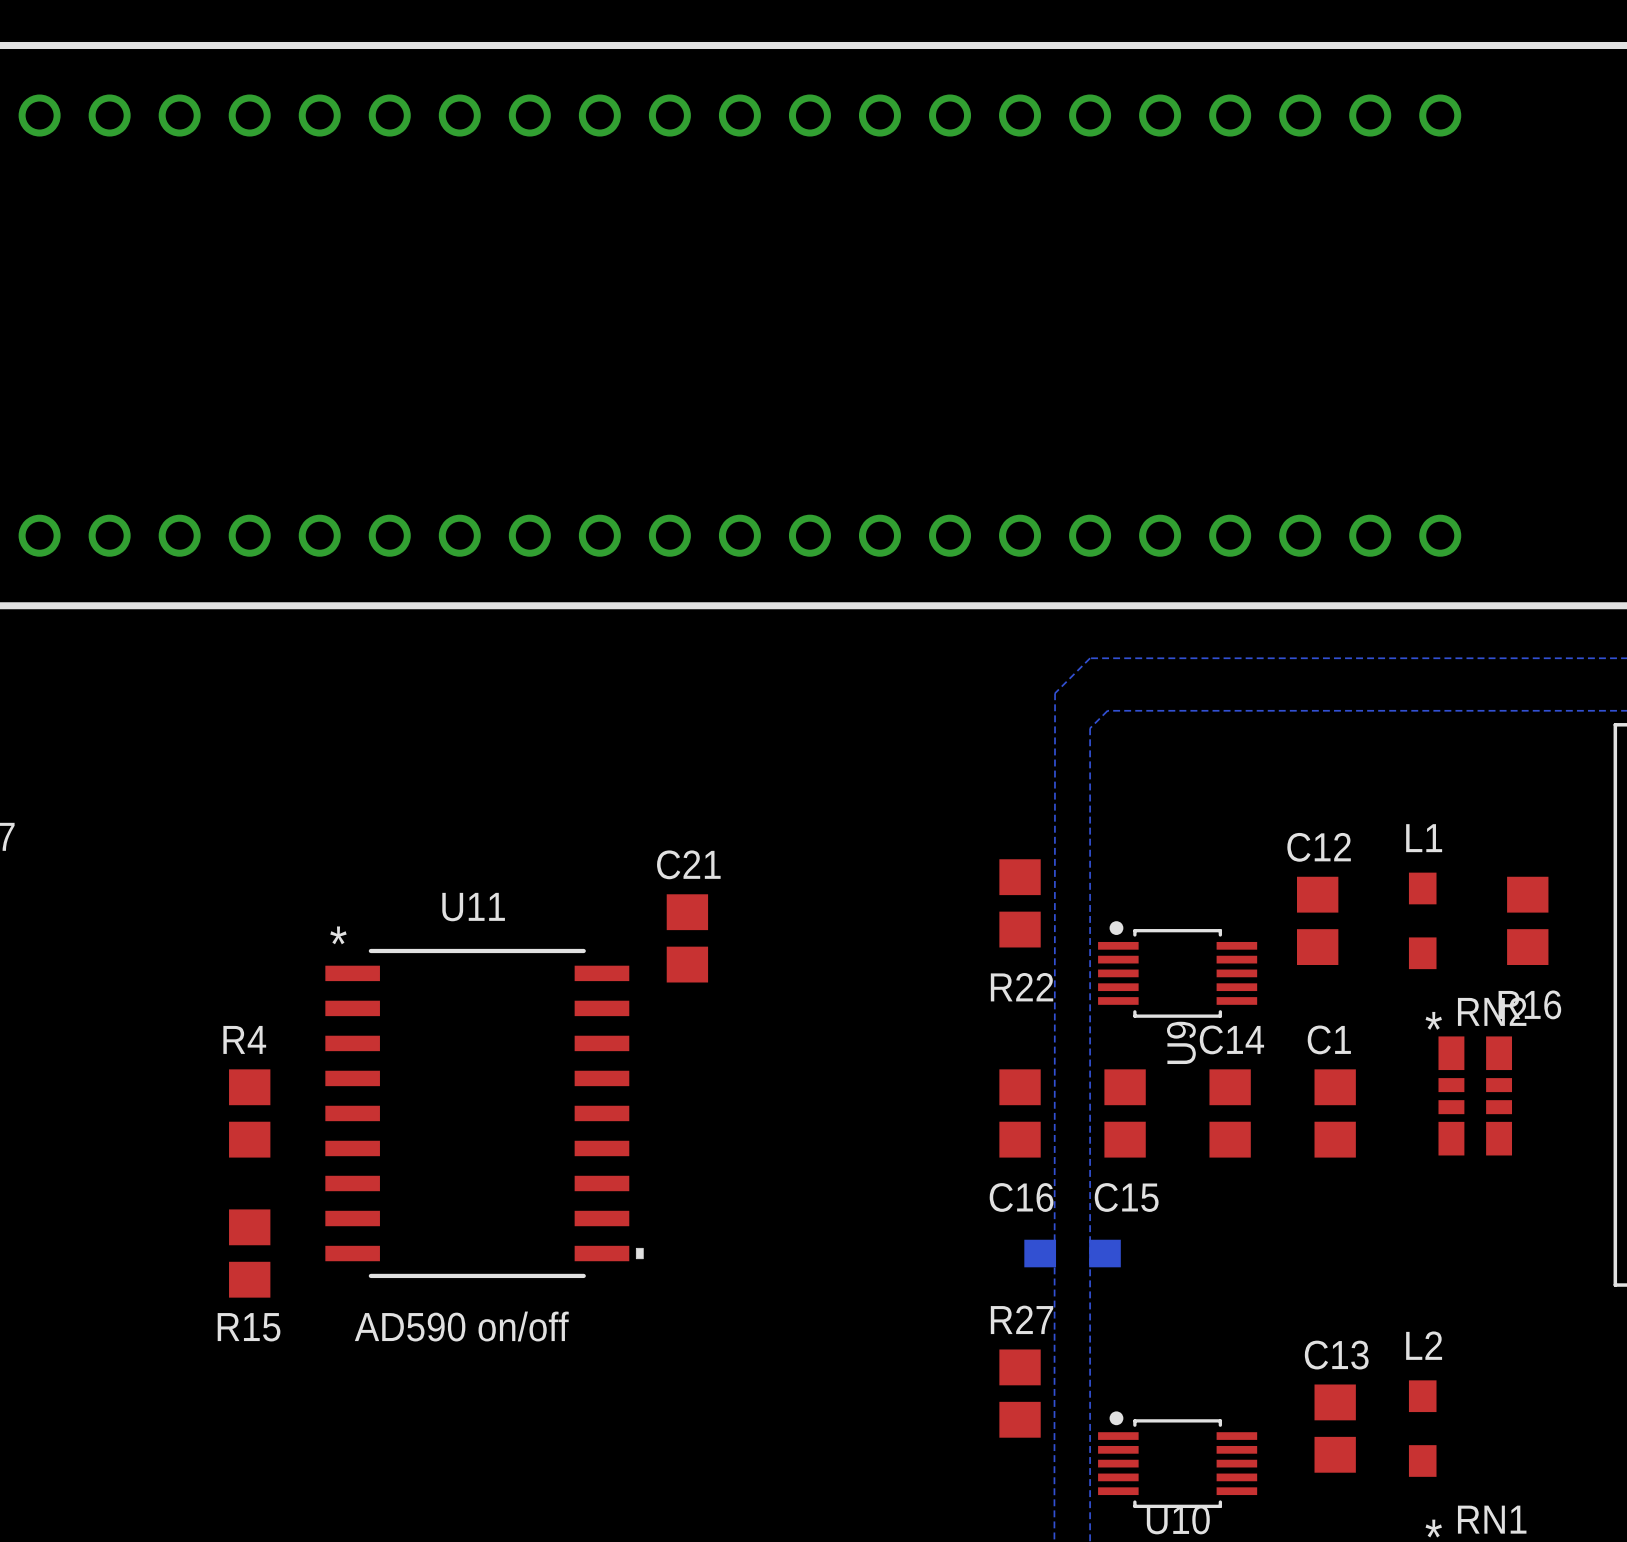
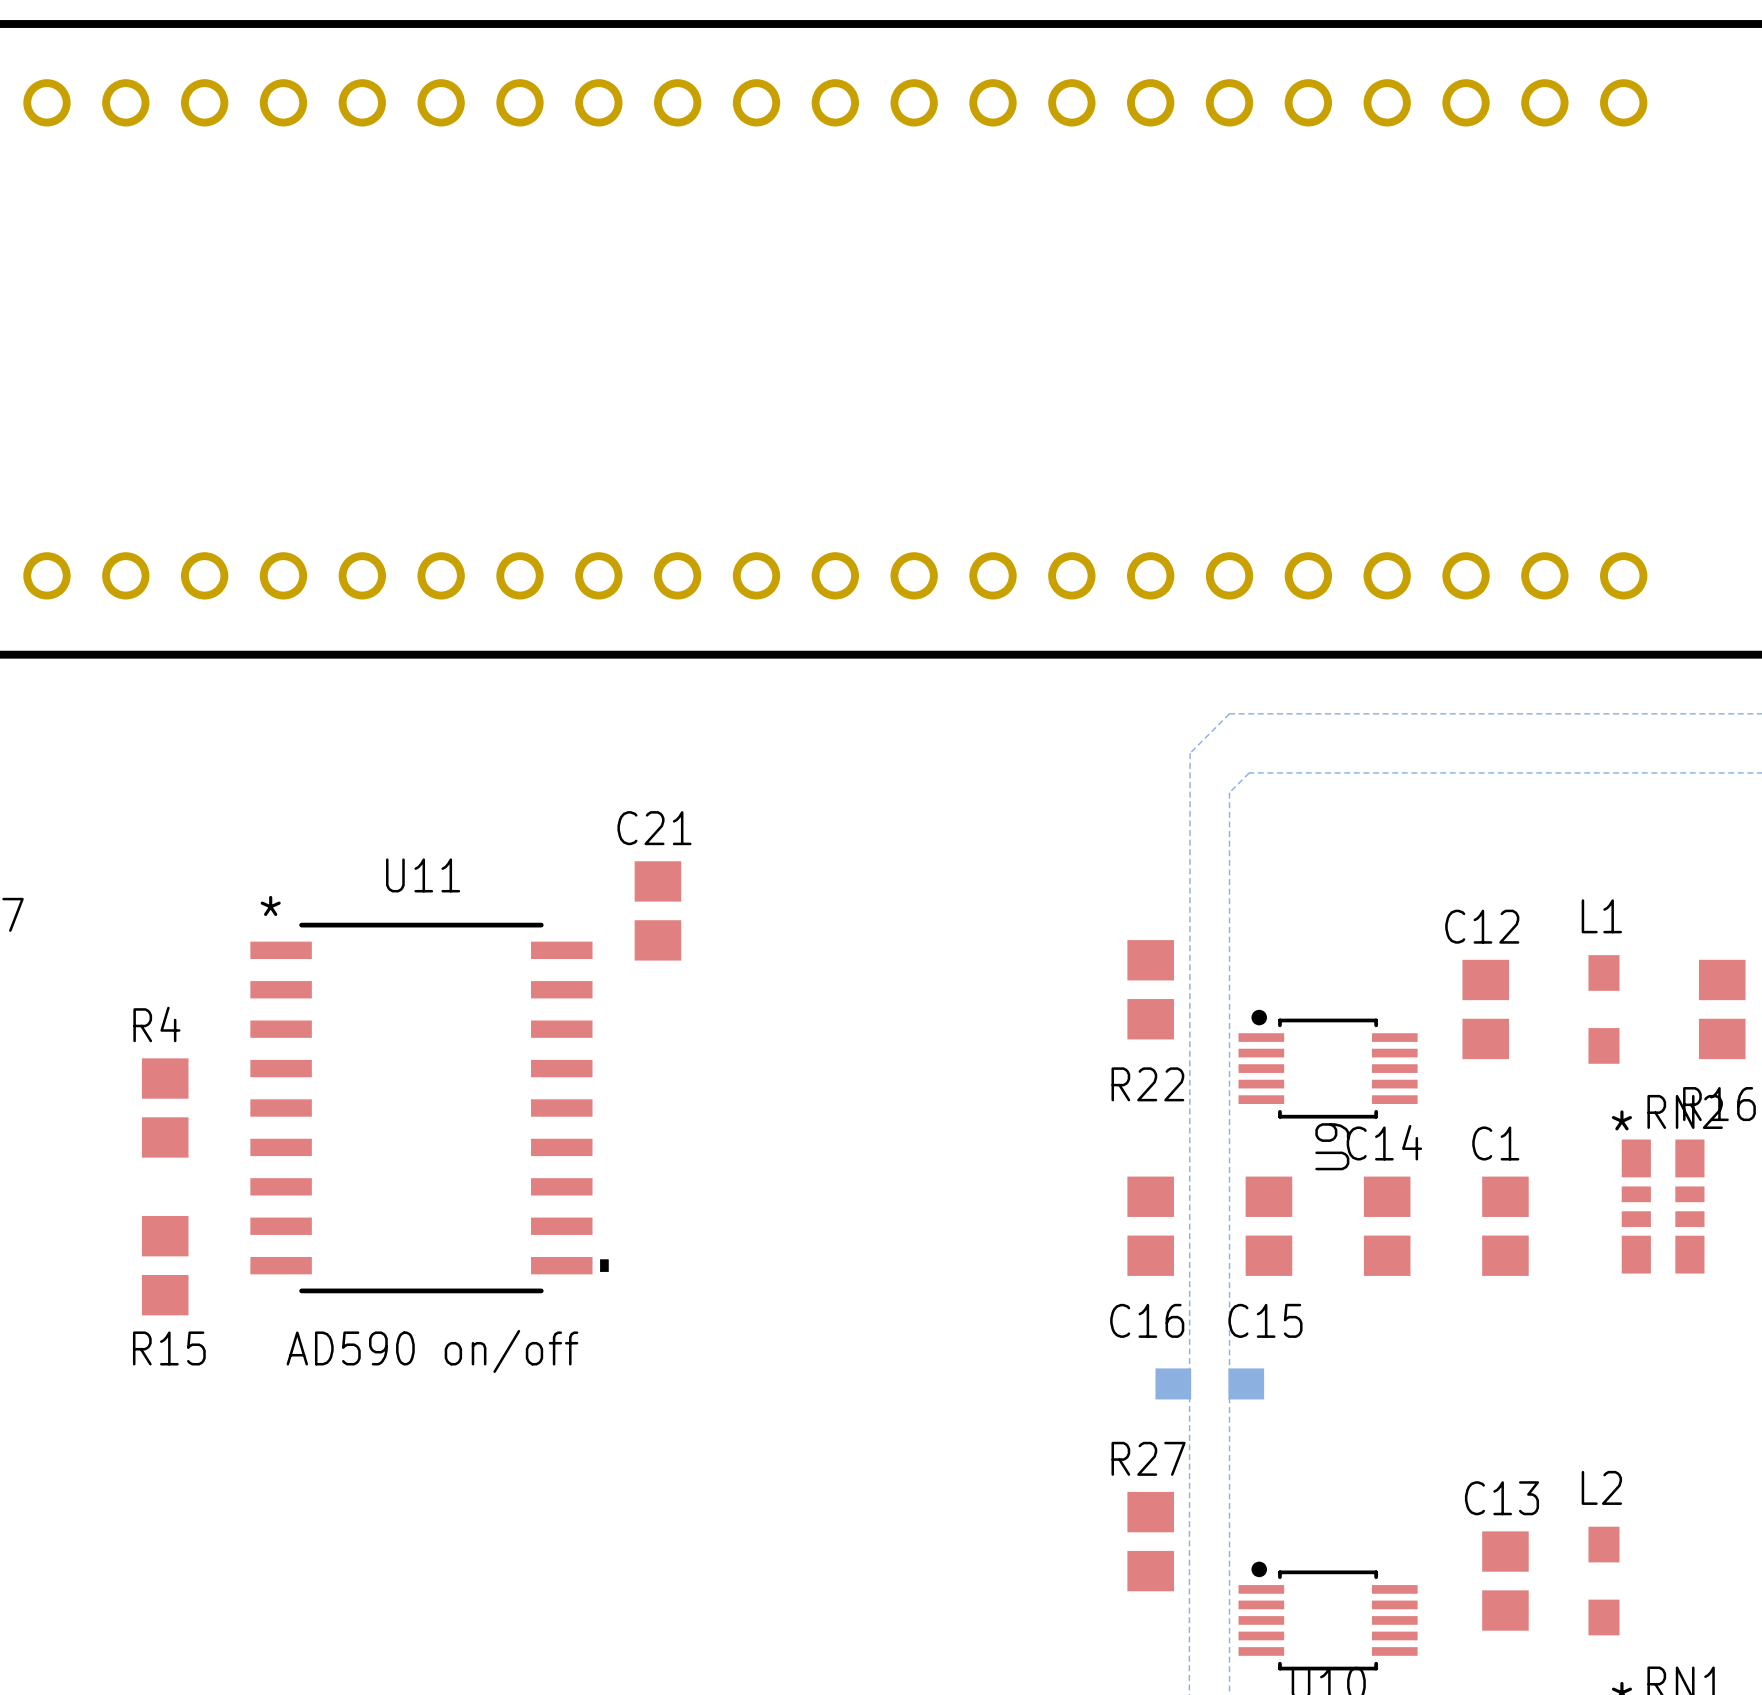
C21 position: (687, 938) -> (657, 910)
R4 position: (249, 1113) -> (165, 1108)
U11 position: (484, 1113) -> (429, 1108)
R15 position: (249, 1253) -> (165, 1265)
text position: AD590 on/off (461, 1326) -> AD590 on/off (432, 1351)

